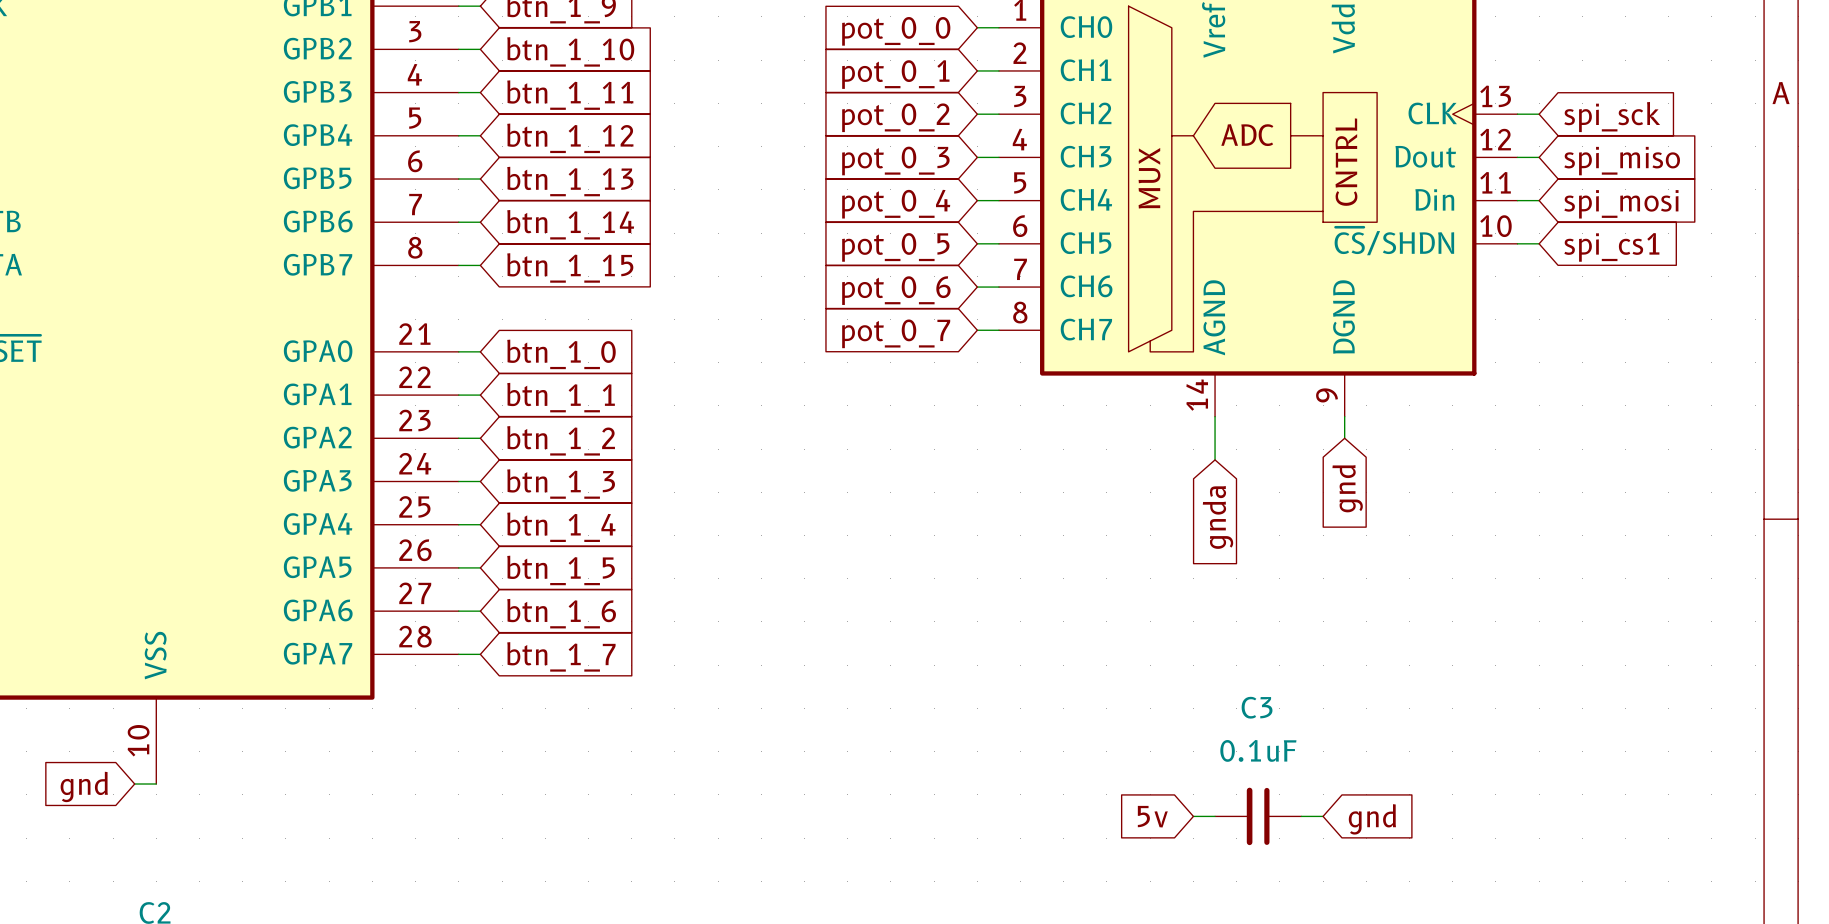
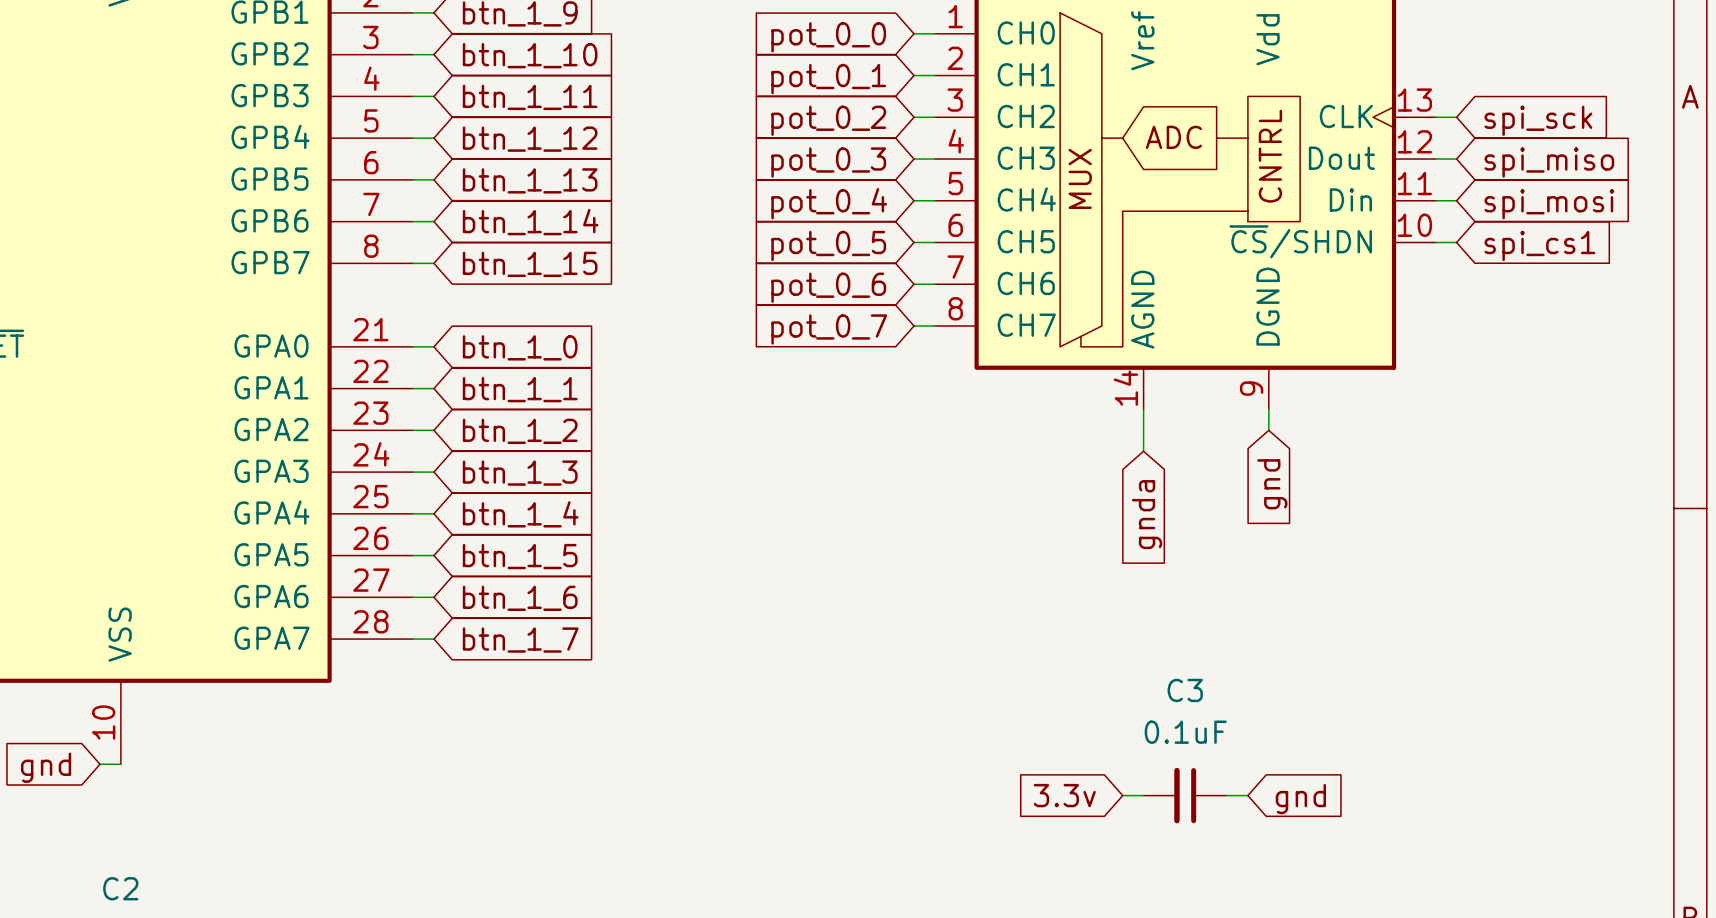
global label: 5v (1152, 816) -> 3.3v (1064, 795)

